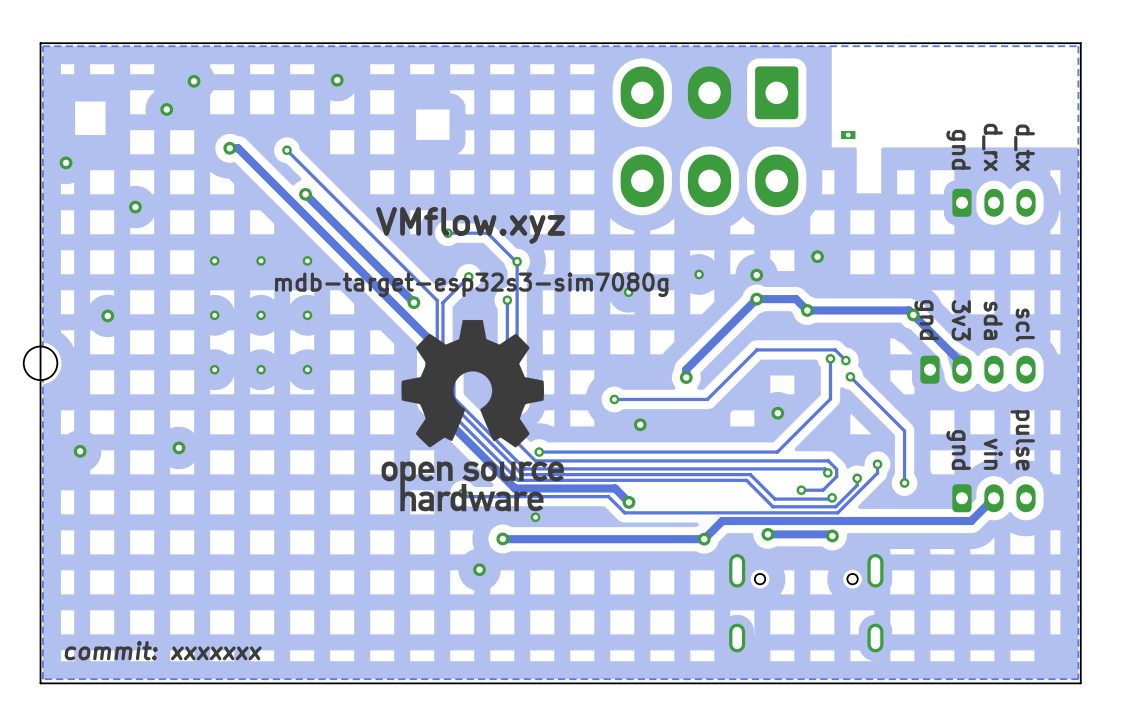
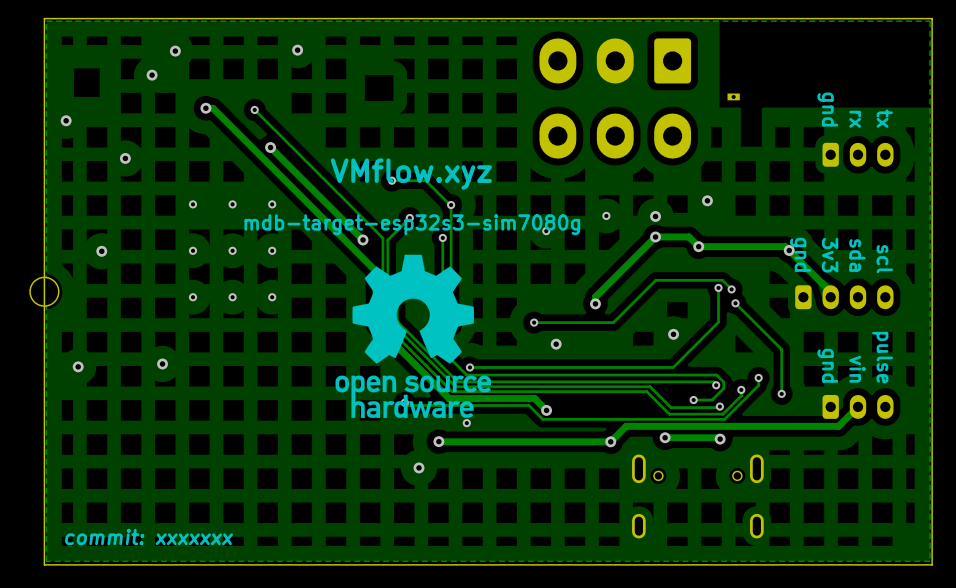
text: d_rx (992, 147) -> rx (855, 119)
text: d_tx (1024, 147) -> tx (884, 118)

